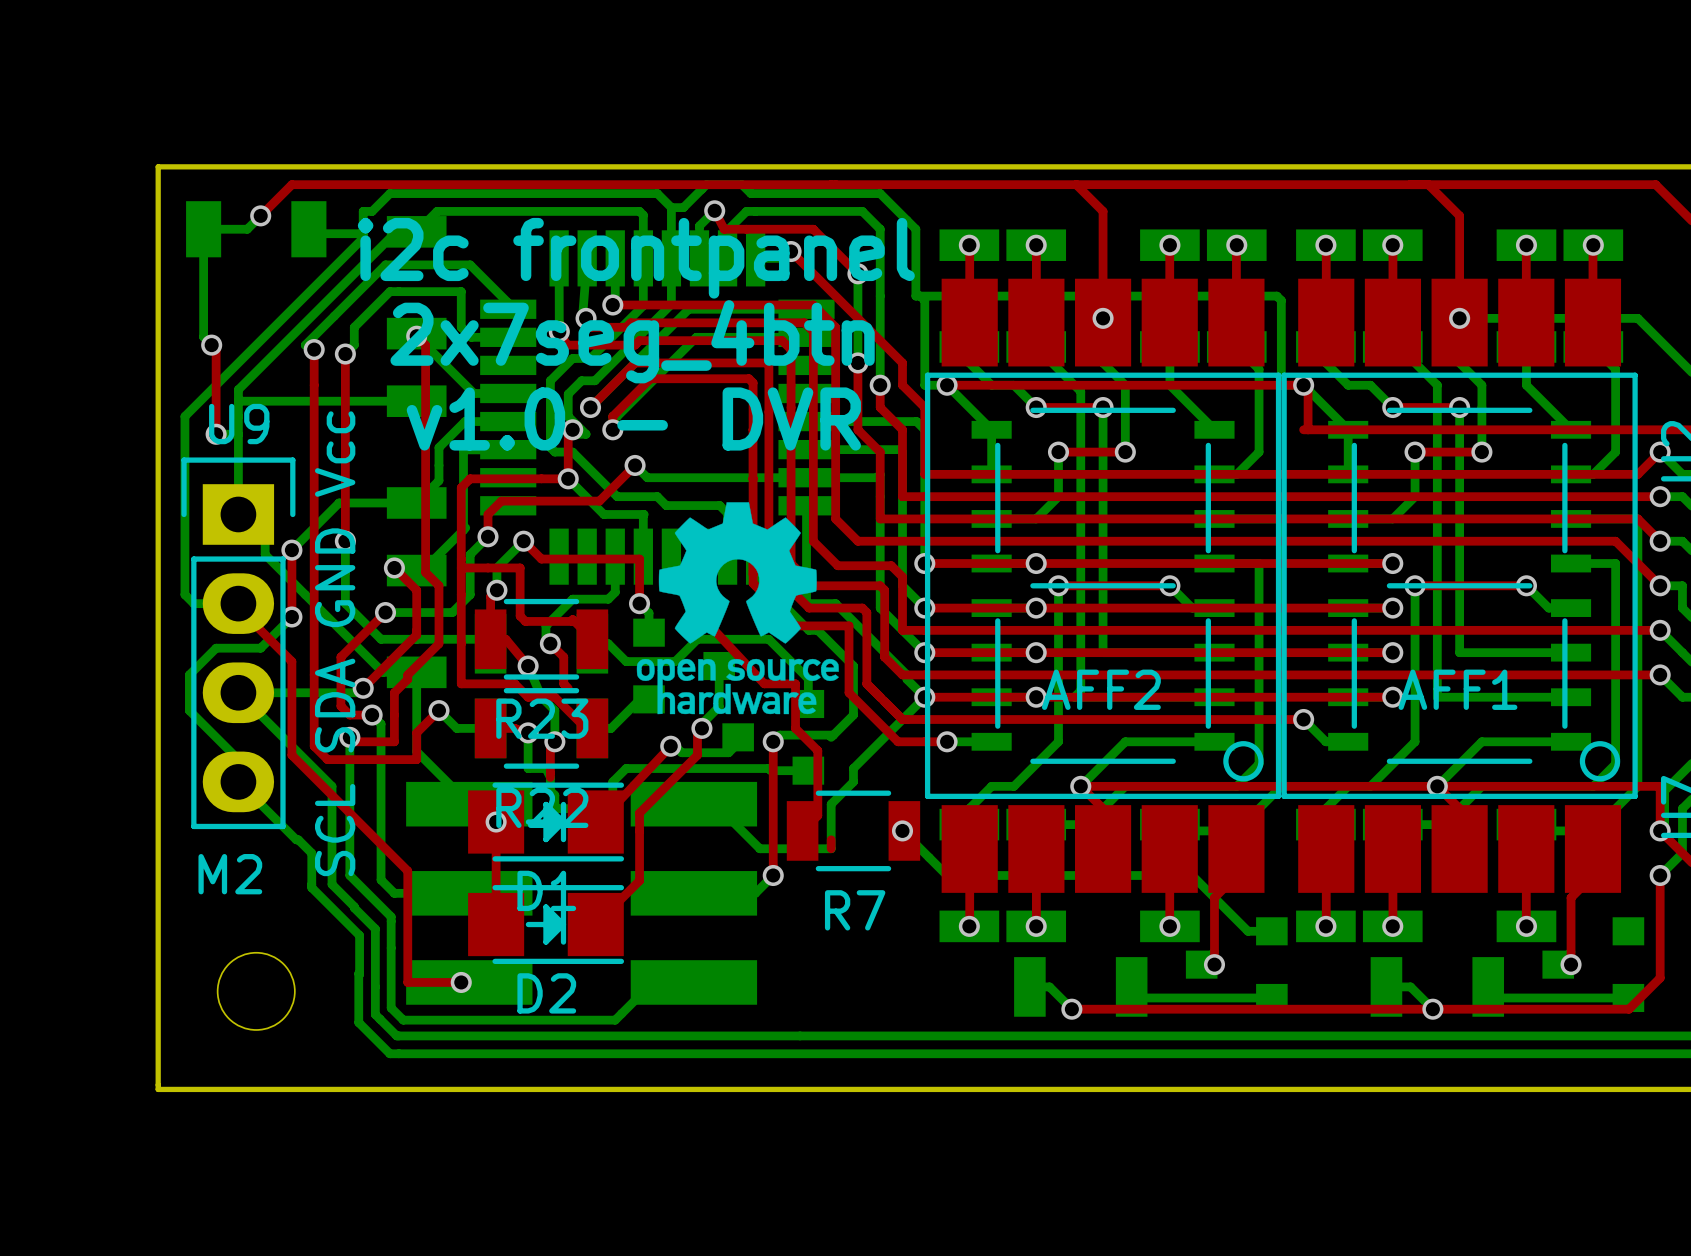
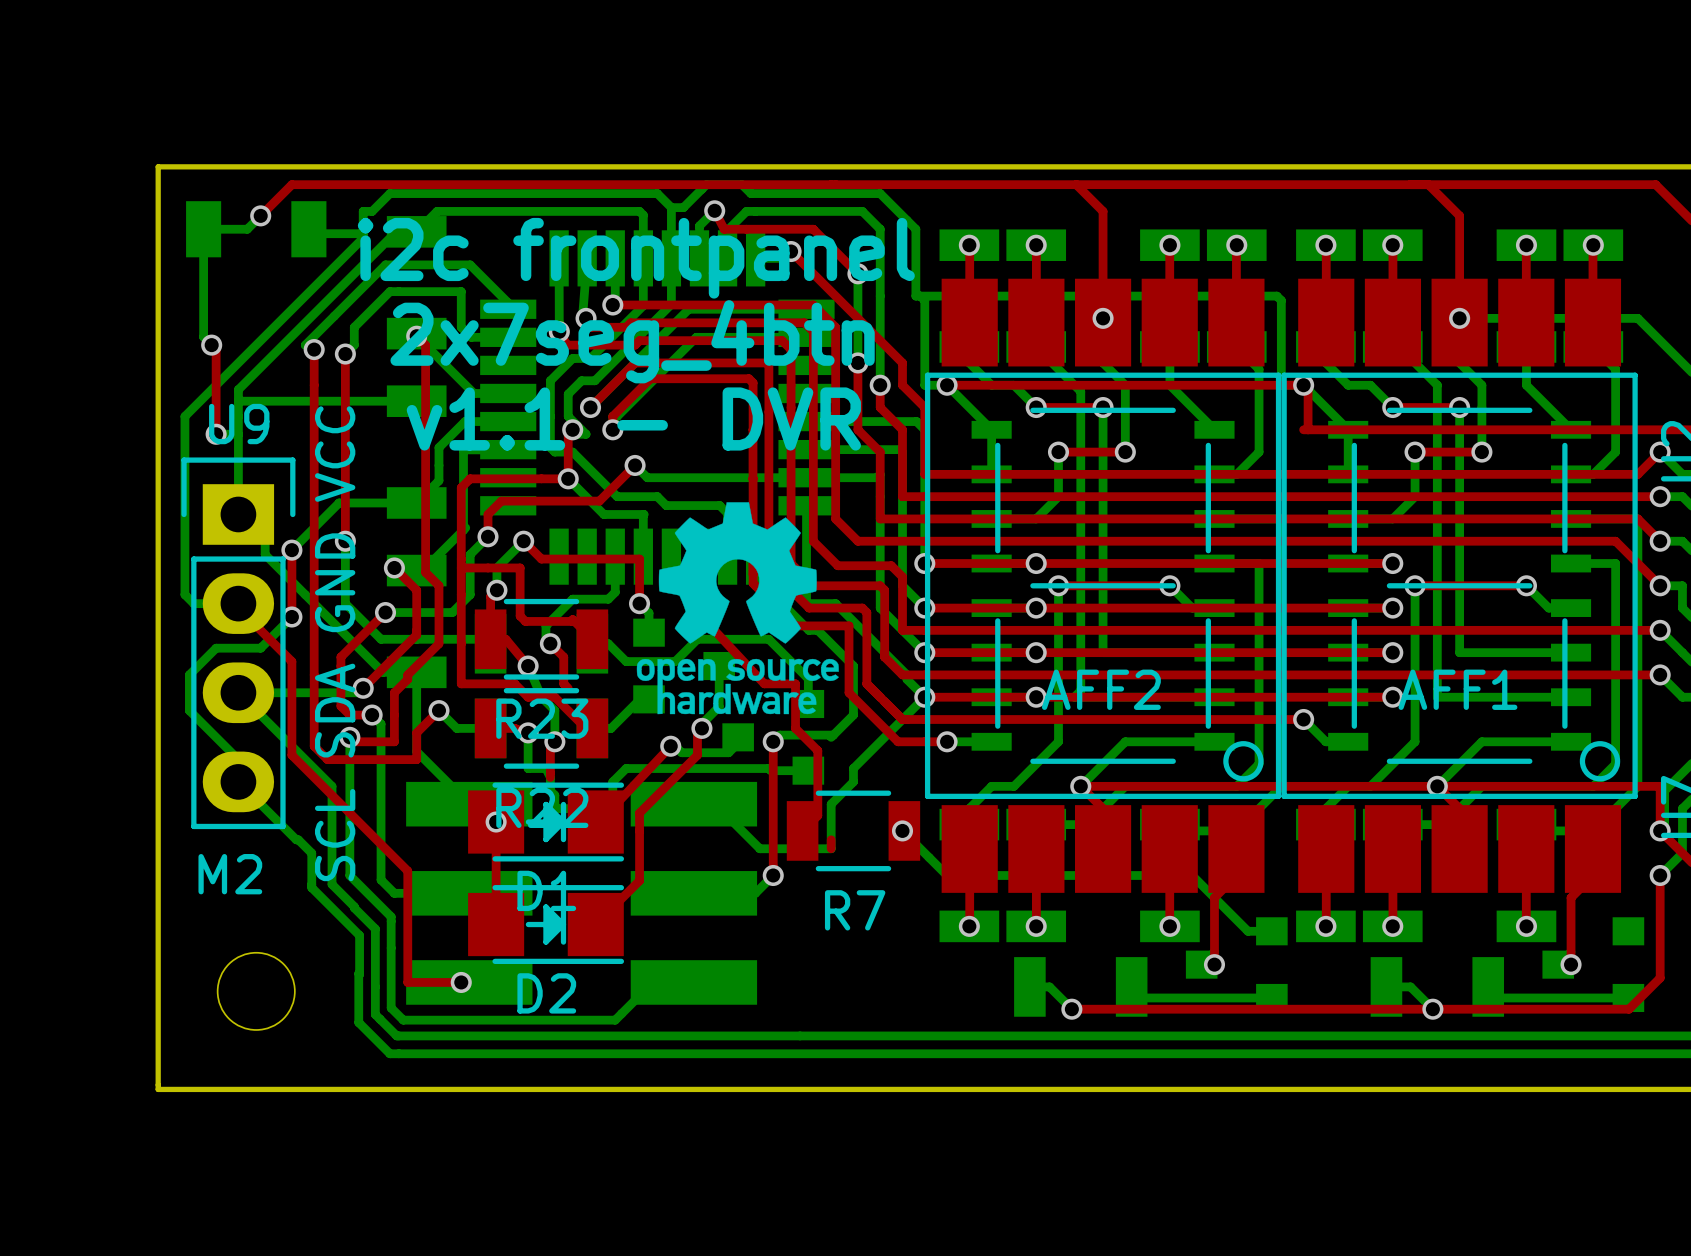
text: v1.0 - DVR (633, 418) -> v1.1 - DVR (633, 418)
U9 value: SCL SDA GND Vcc (335, 643) -> SCL SDA GND VCC (335, 643)

